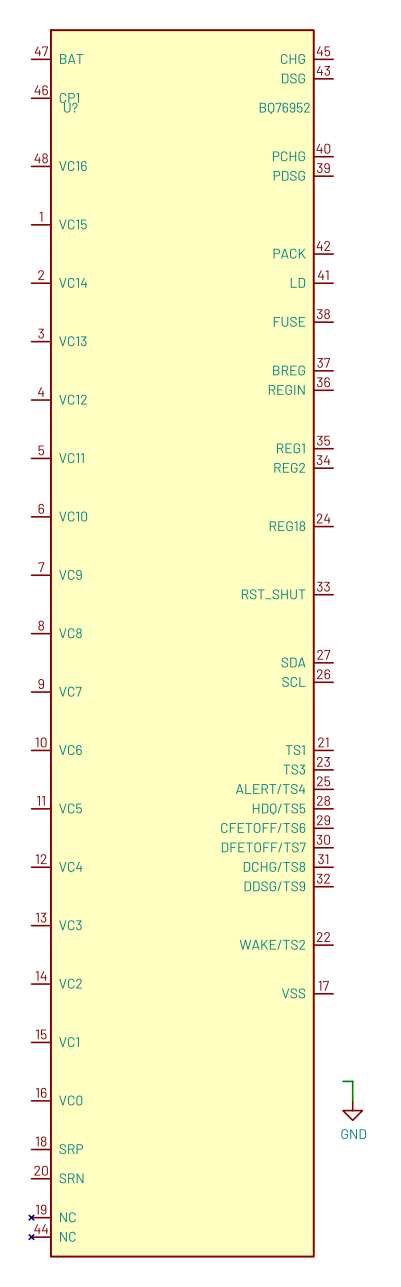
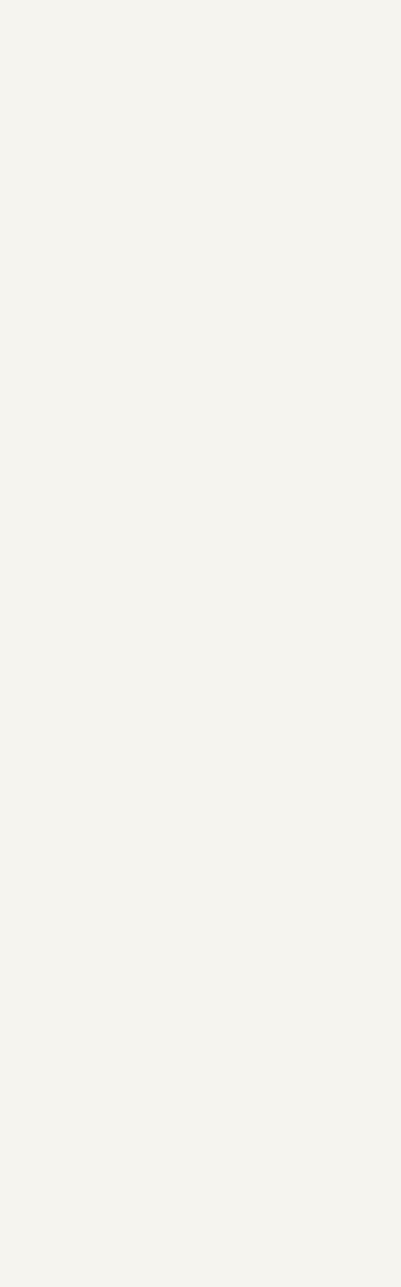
U?: BQ76952 (181, 643) -> none
wire: (342, 1081) (352, 1081) (352, 1100) -> none
power symbol: GND (352, 1110) -> none

